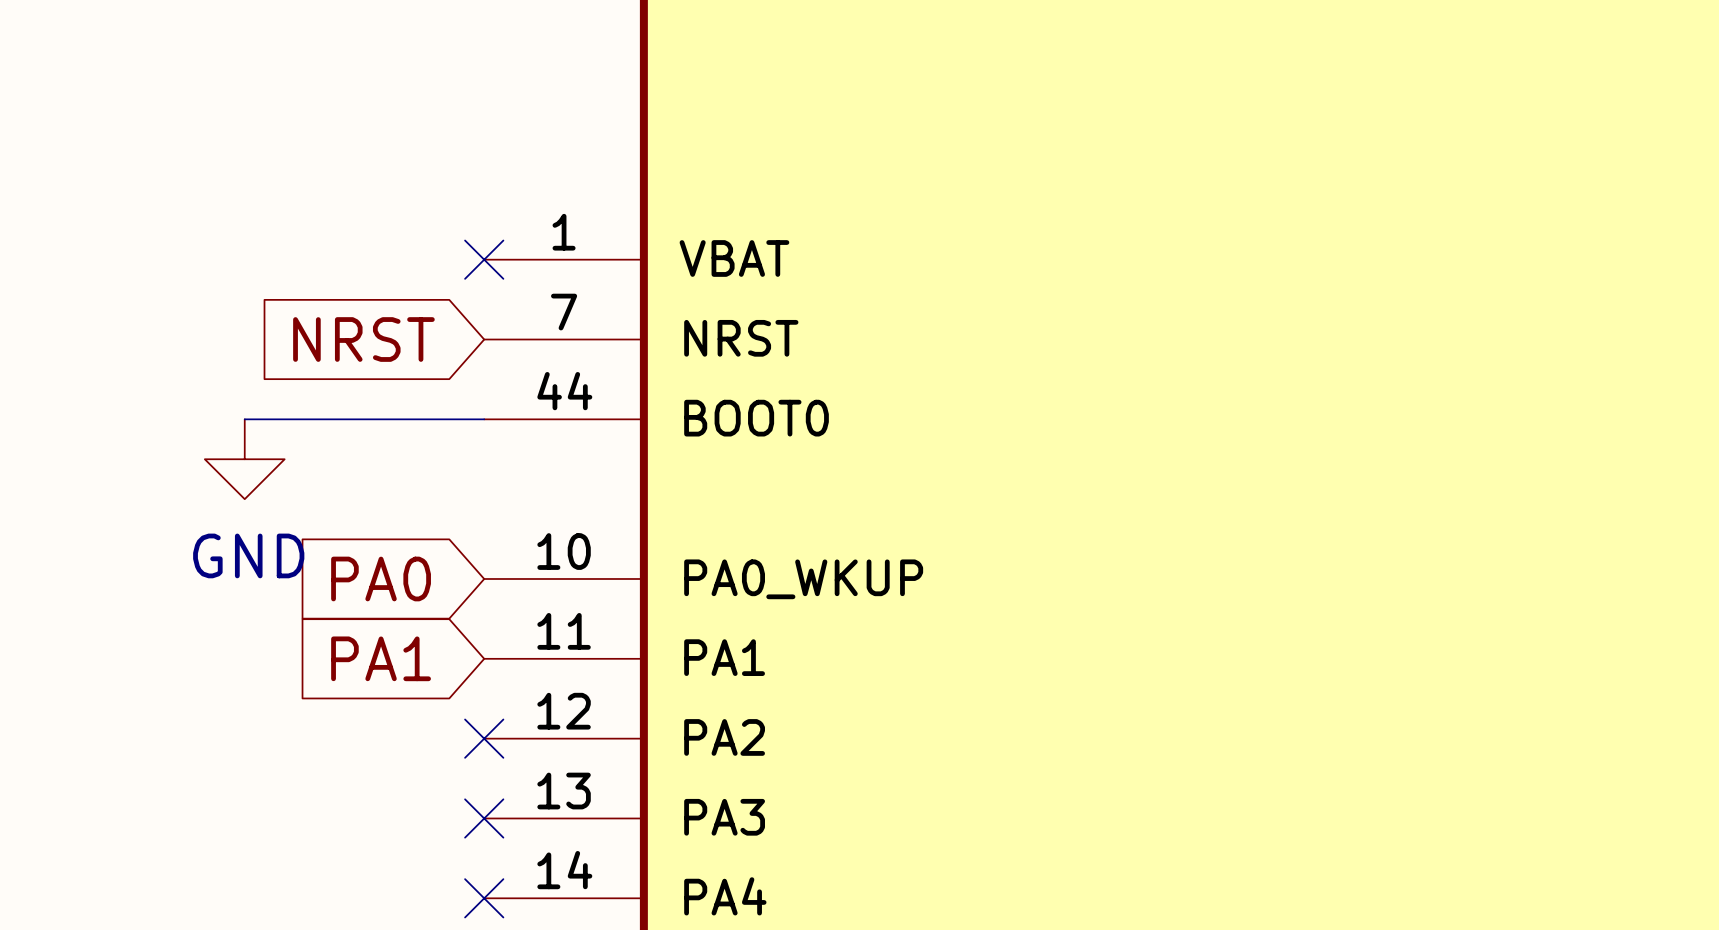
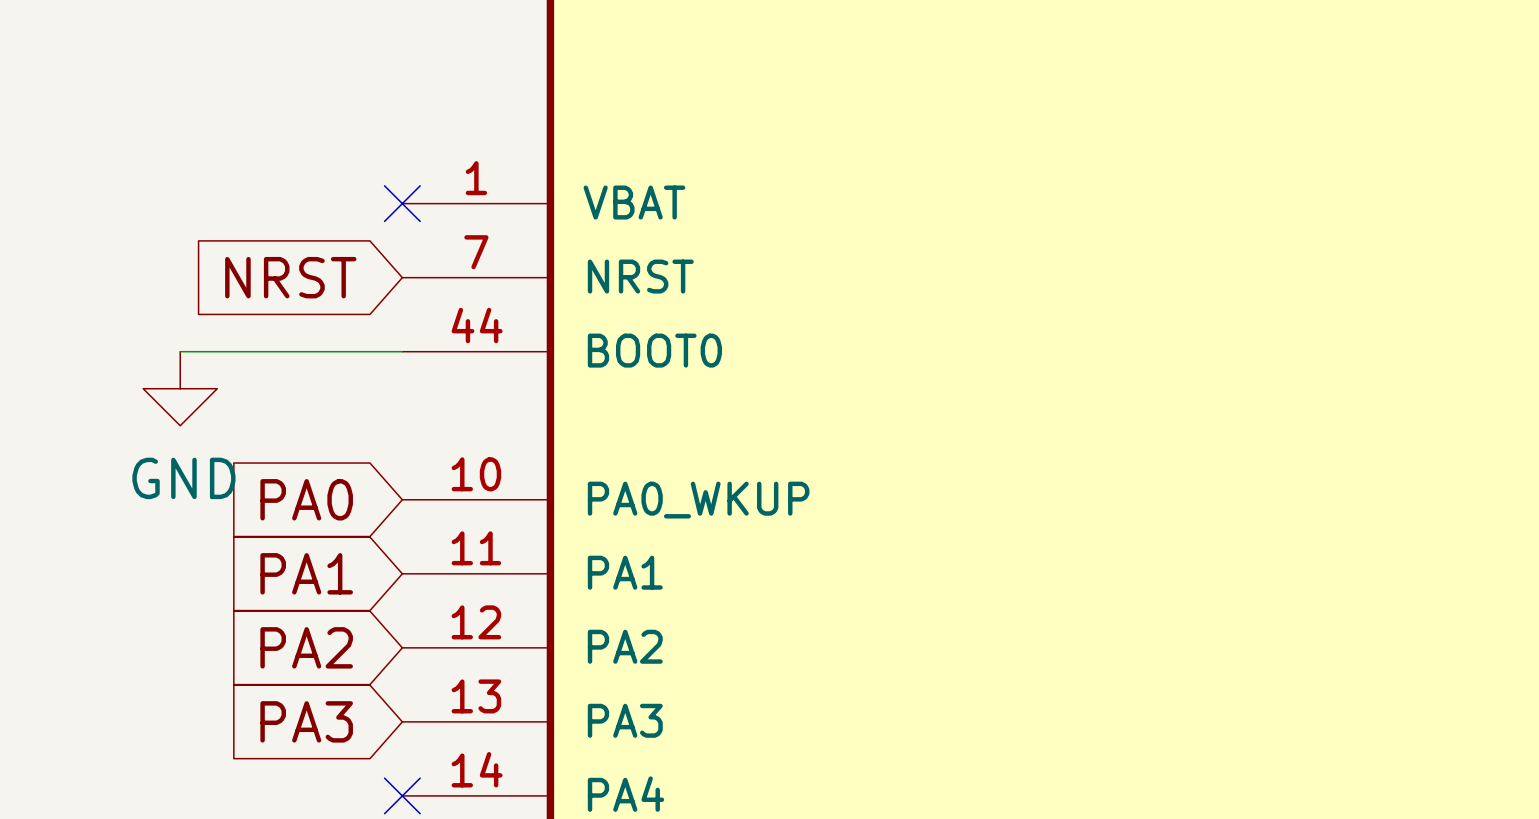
global label: none -> PA2 (306, 647)
no-connect mark: (484, 738) -> none
global label: none -> PA3 (306, 721)
no-connect mark: (484, 818) -> none

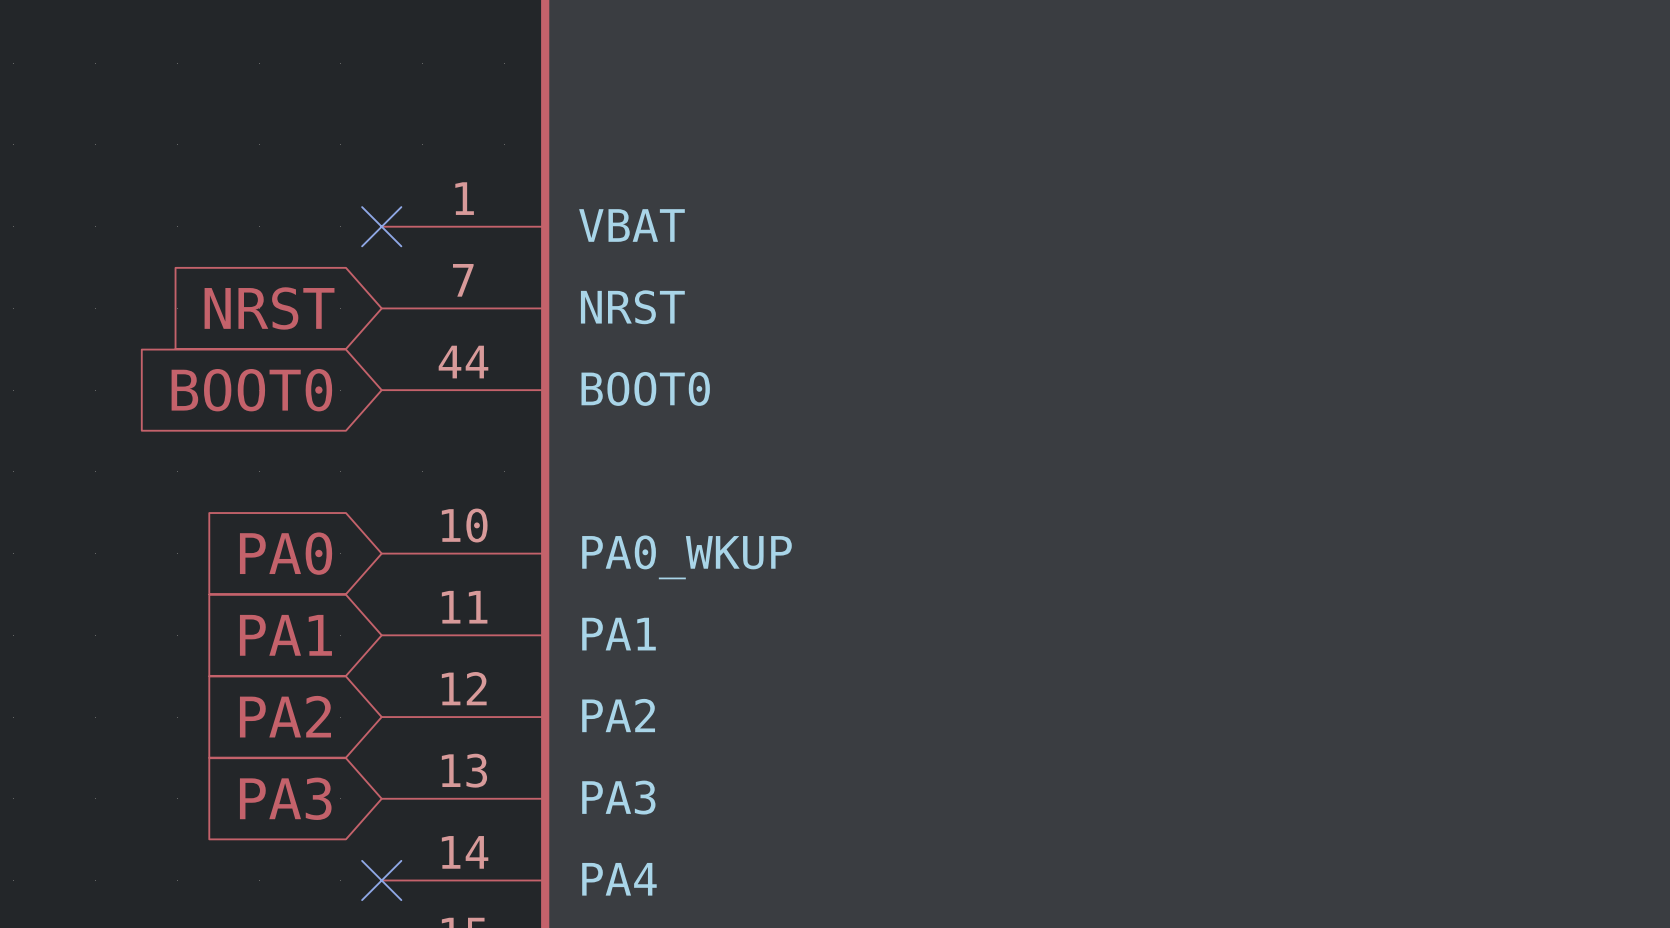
wire: (180, 351) (402, 351) -> none
global label: none -> BOOT0 (251, 390)
power symbol: GND (180, 388) -> none

